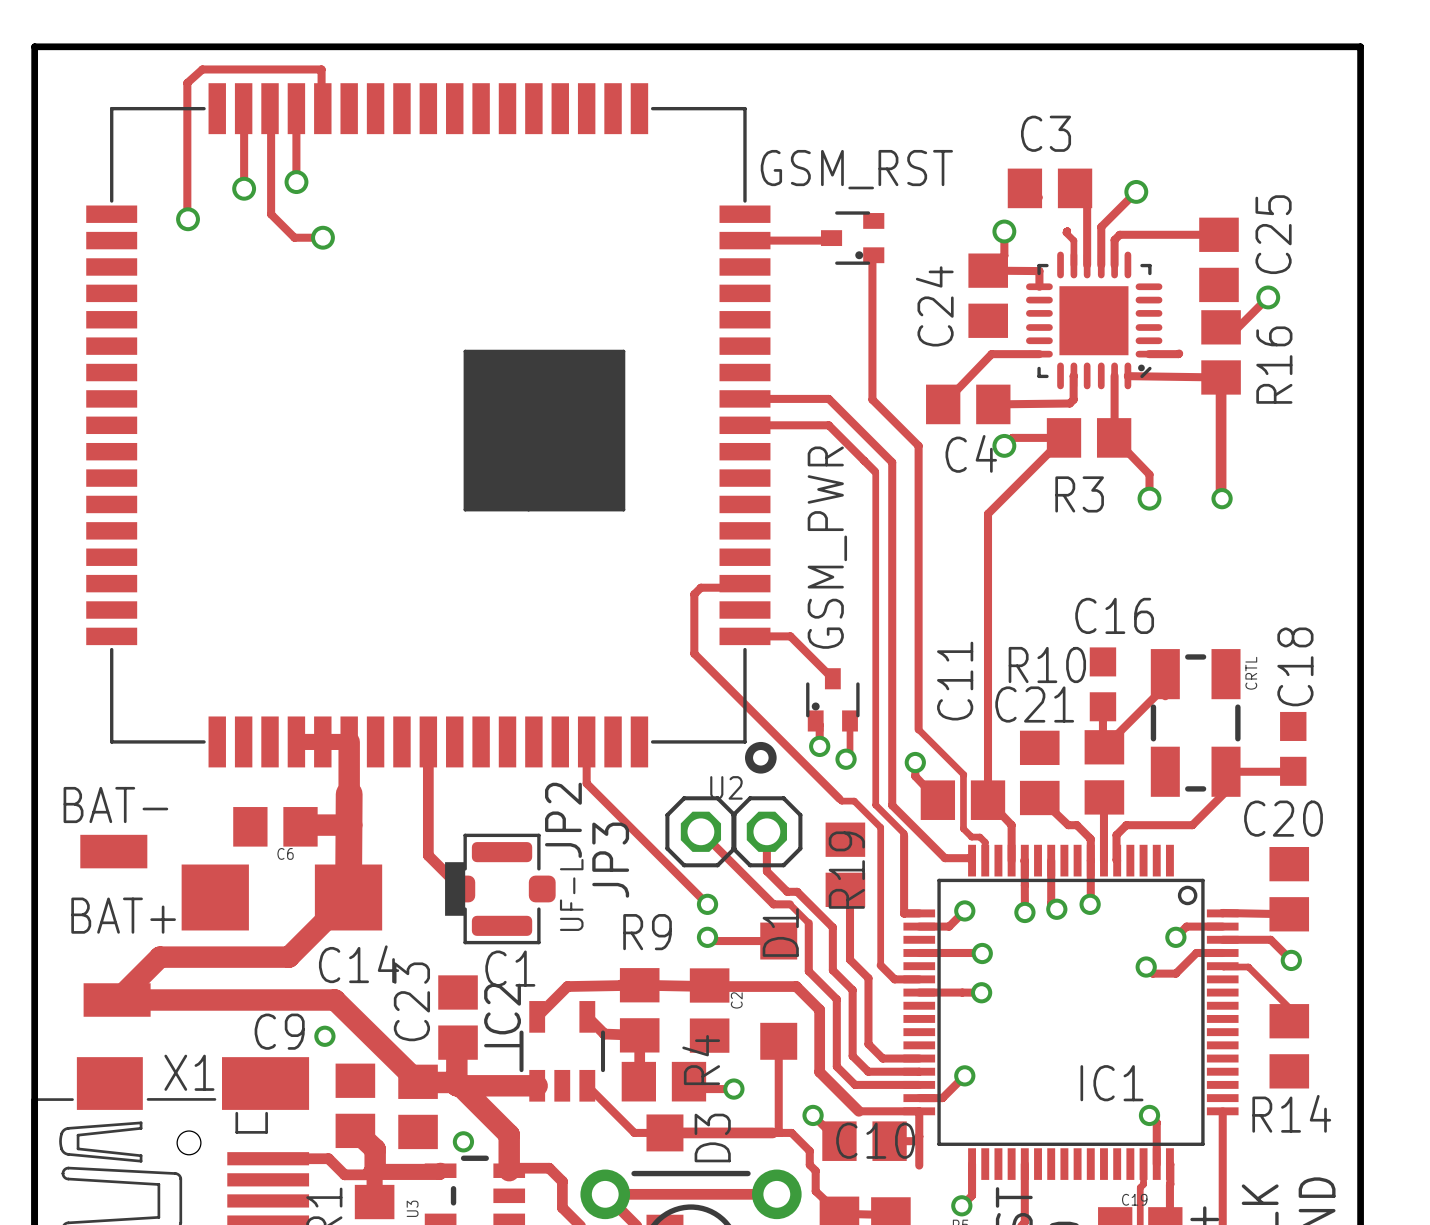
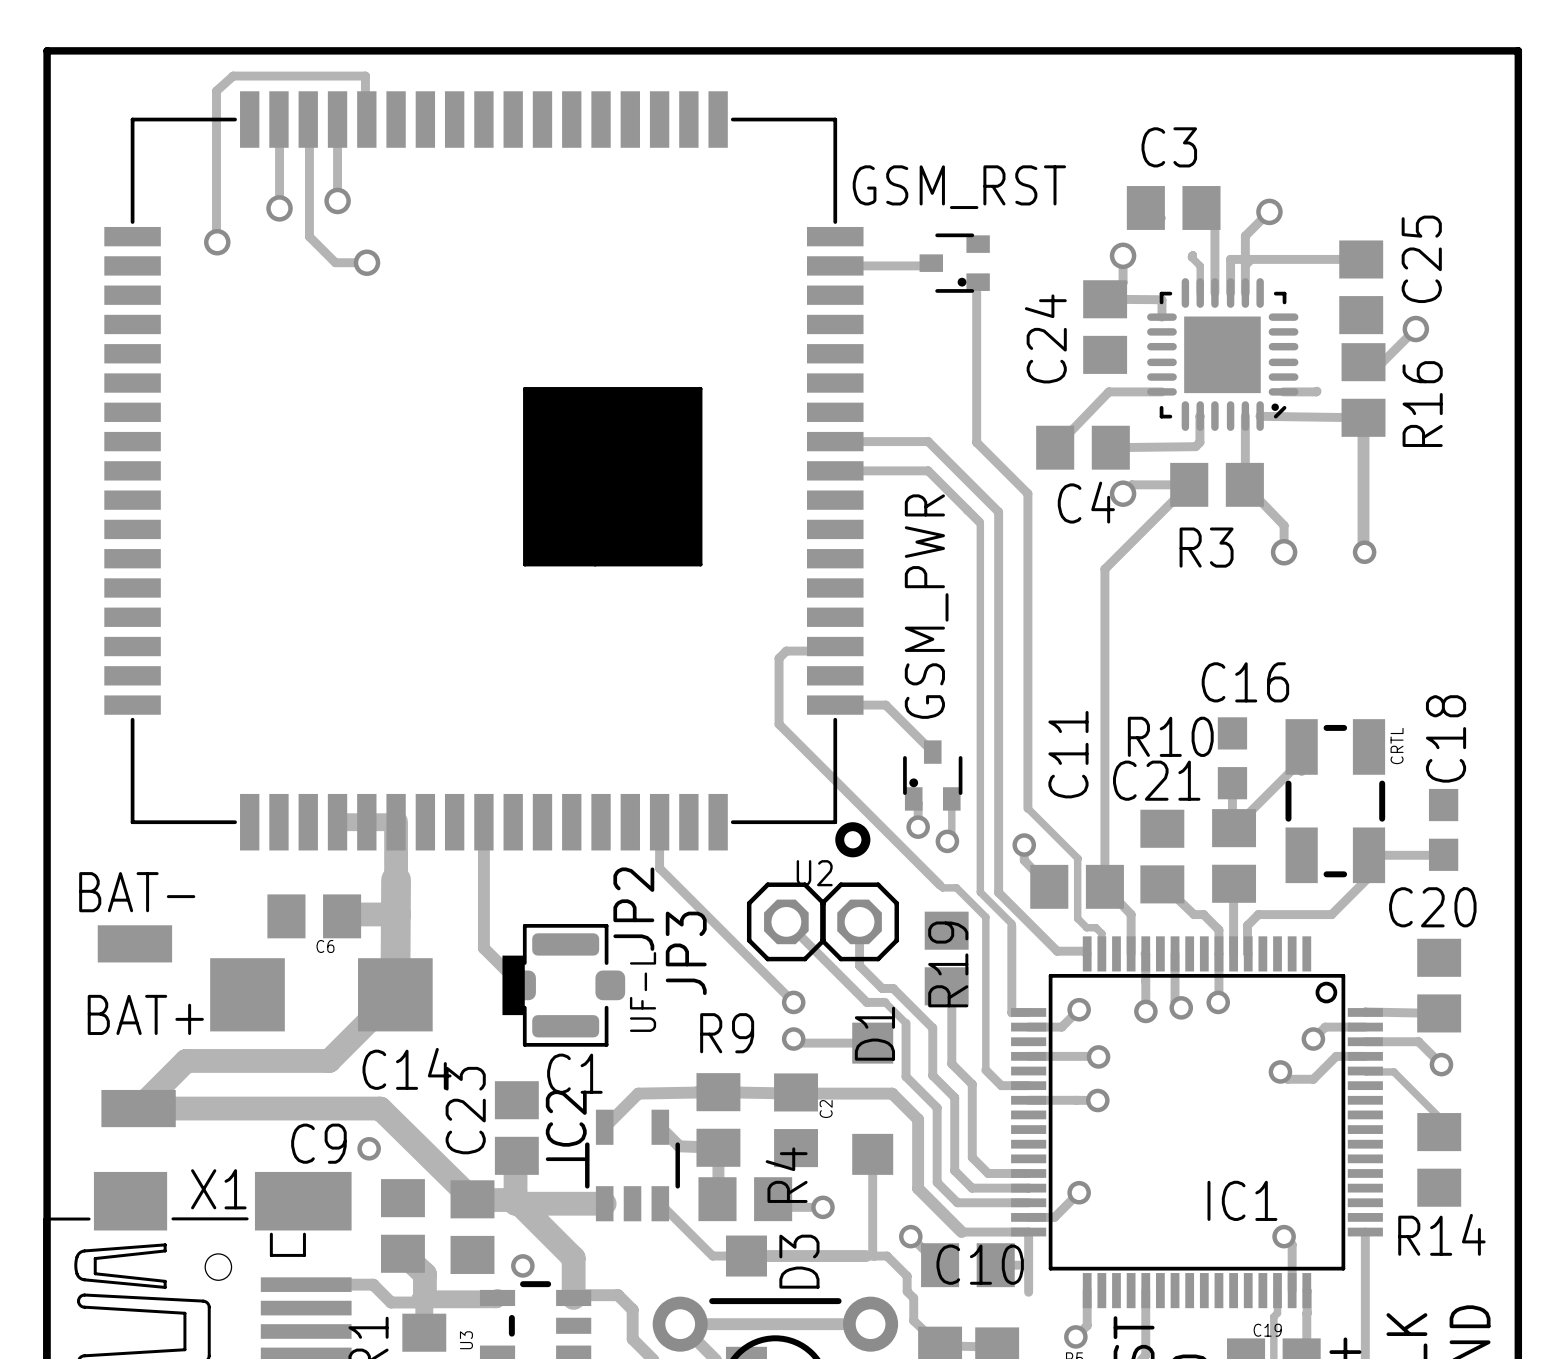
track: (1114, 213) (1101, 226) (1101, 234) -> (1245, 235) (1245, 265)

